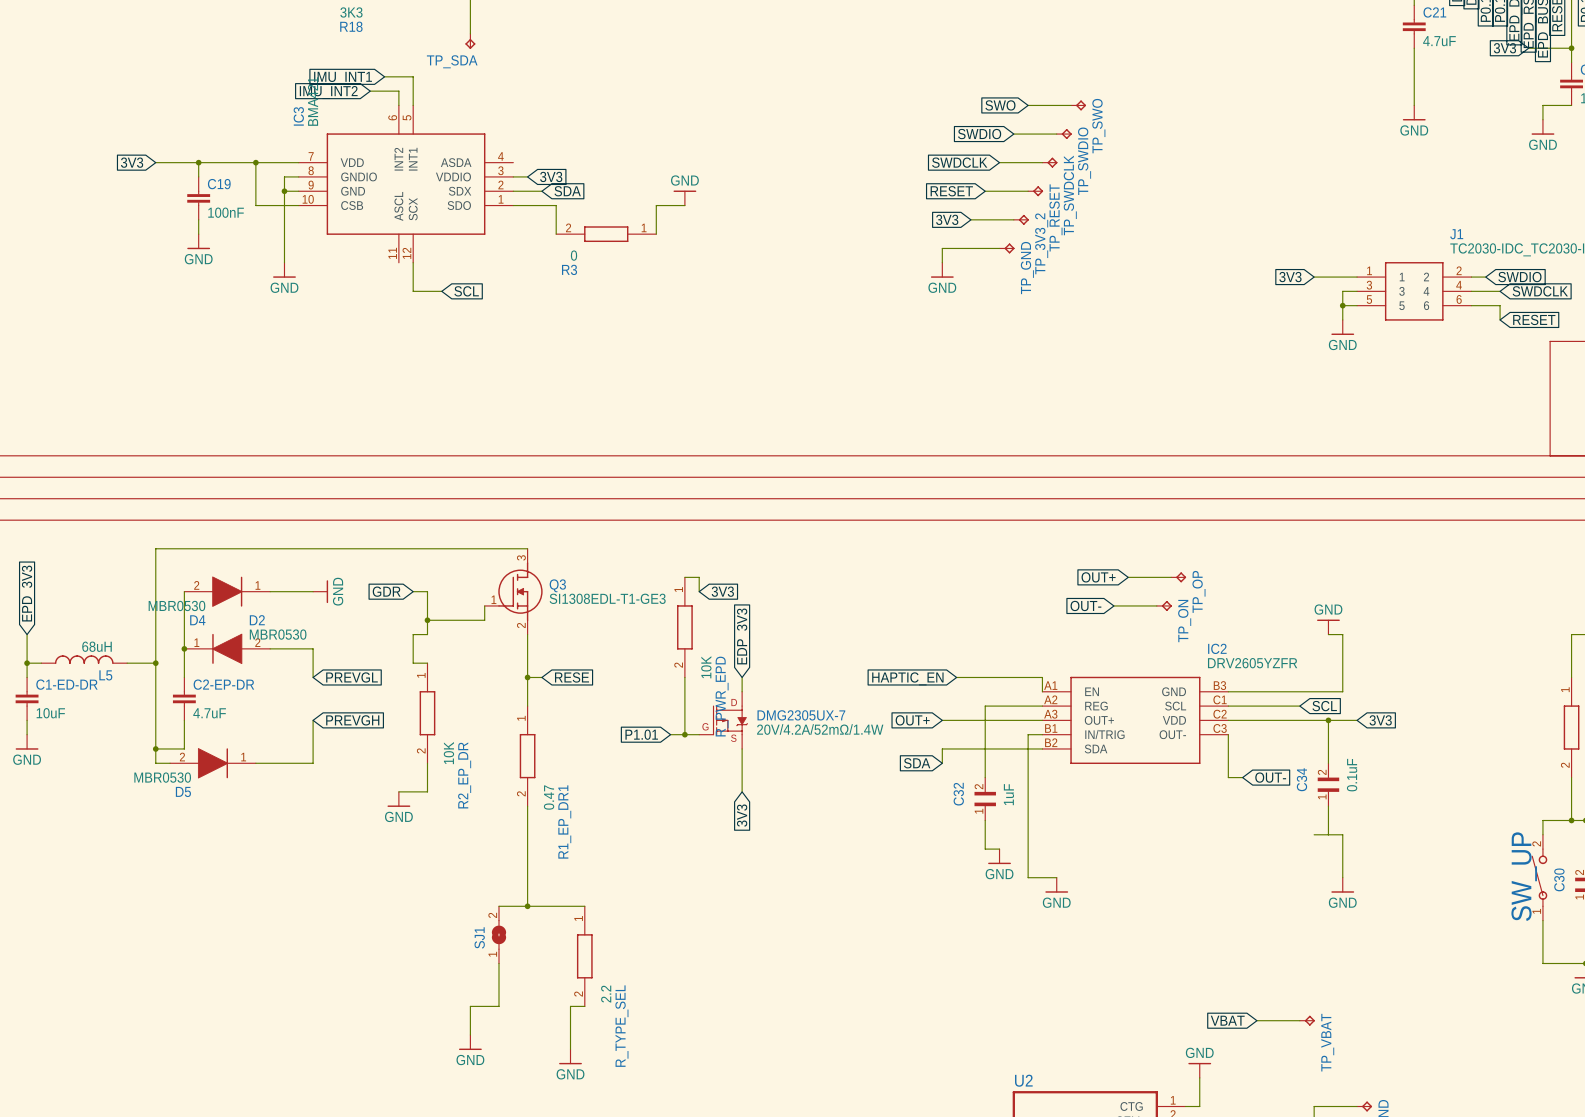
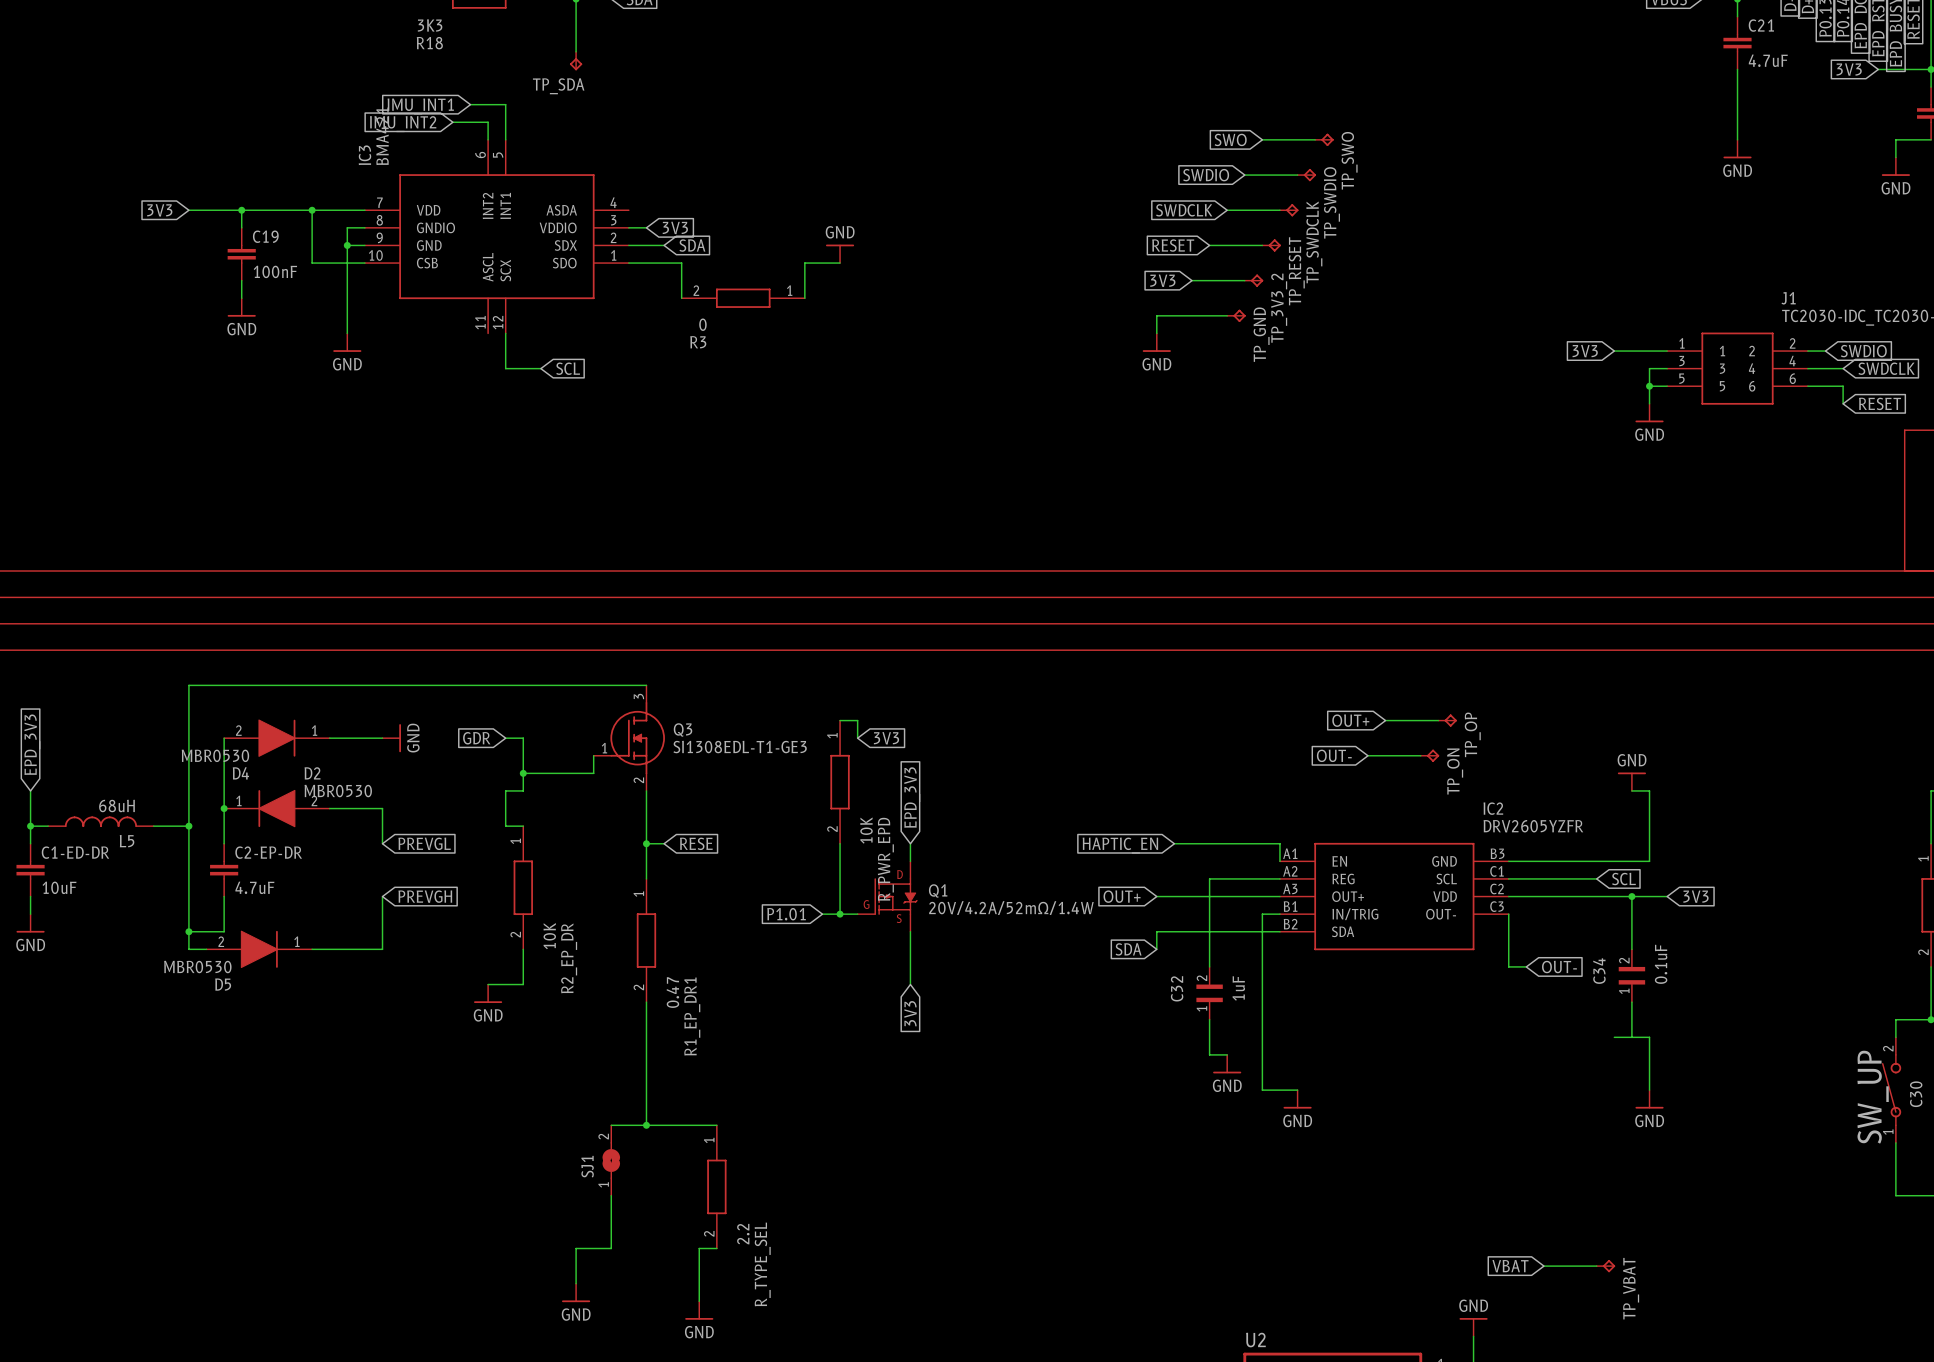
global label: EDP_3V3 (743, 636) -> EPD_3V3 (912, 797)
DMG2305UX-7 name: DMG2305UX-7 (801, 715) -> Q1 (938, 890)

